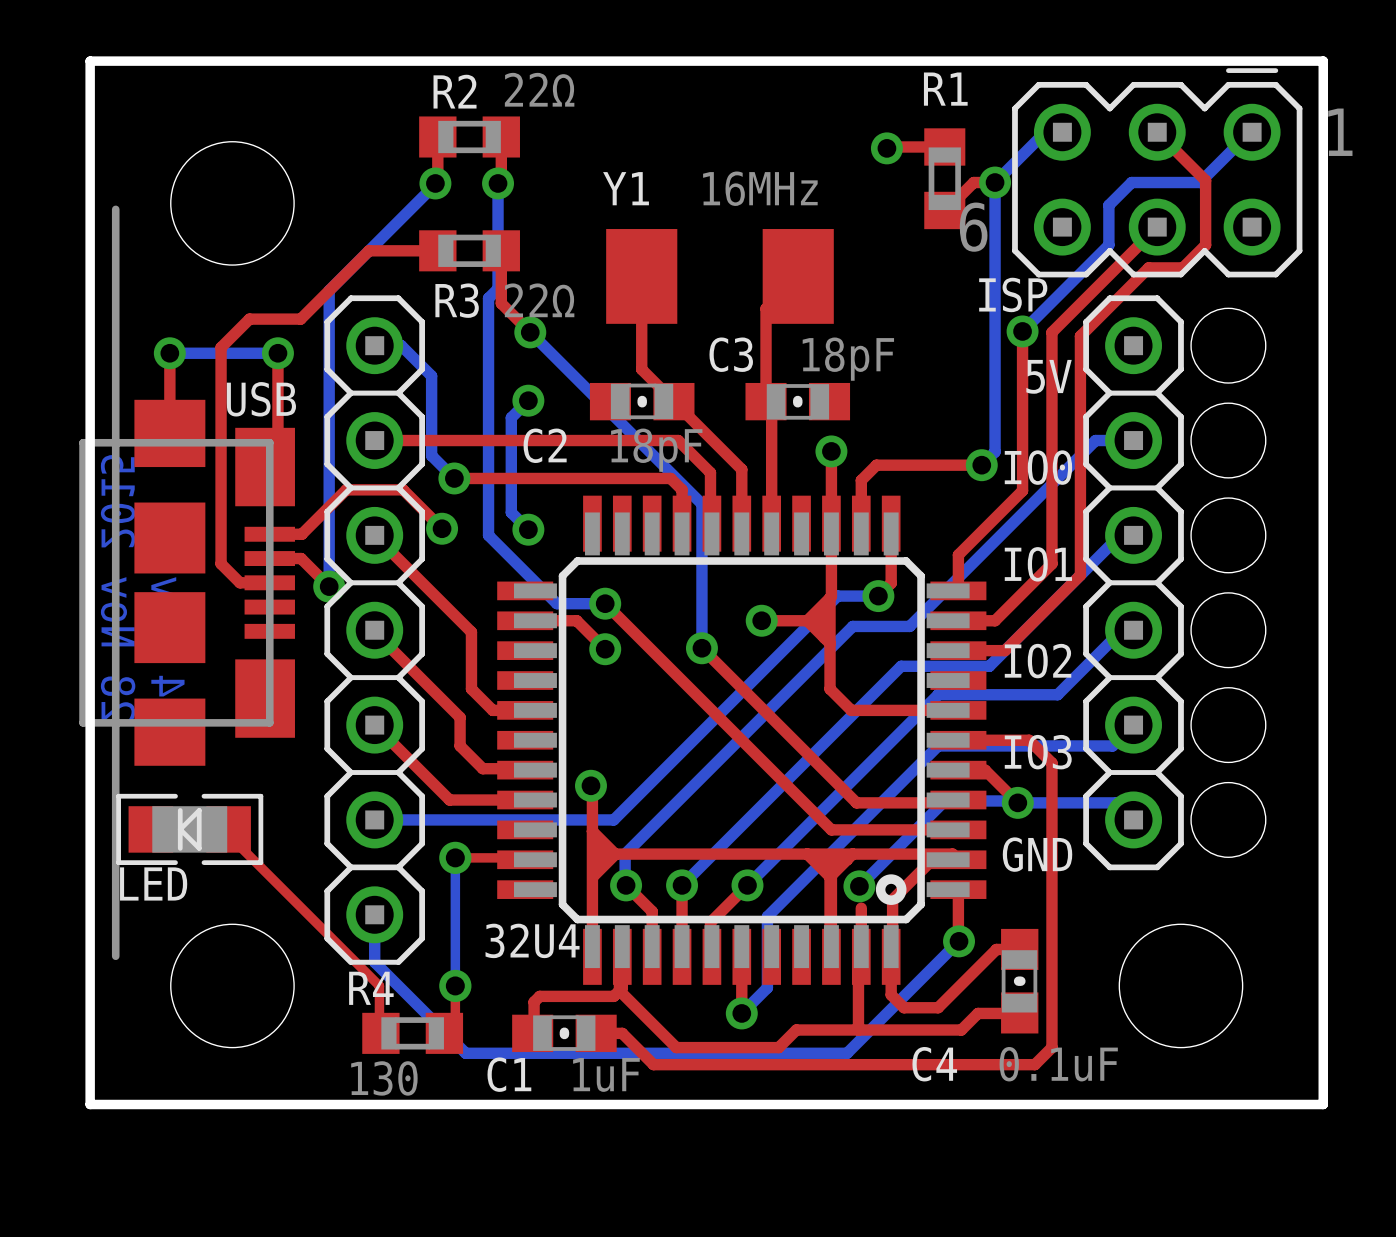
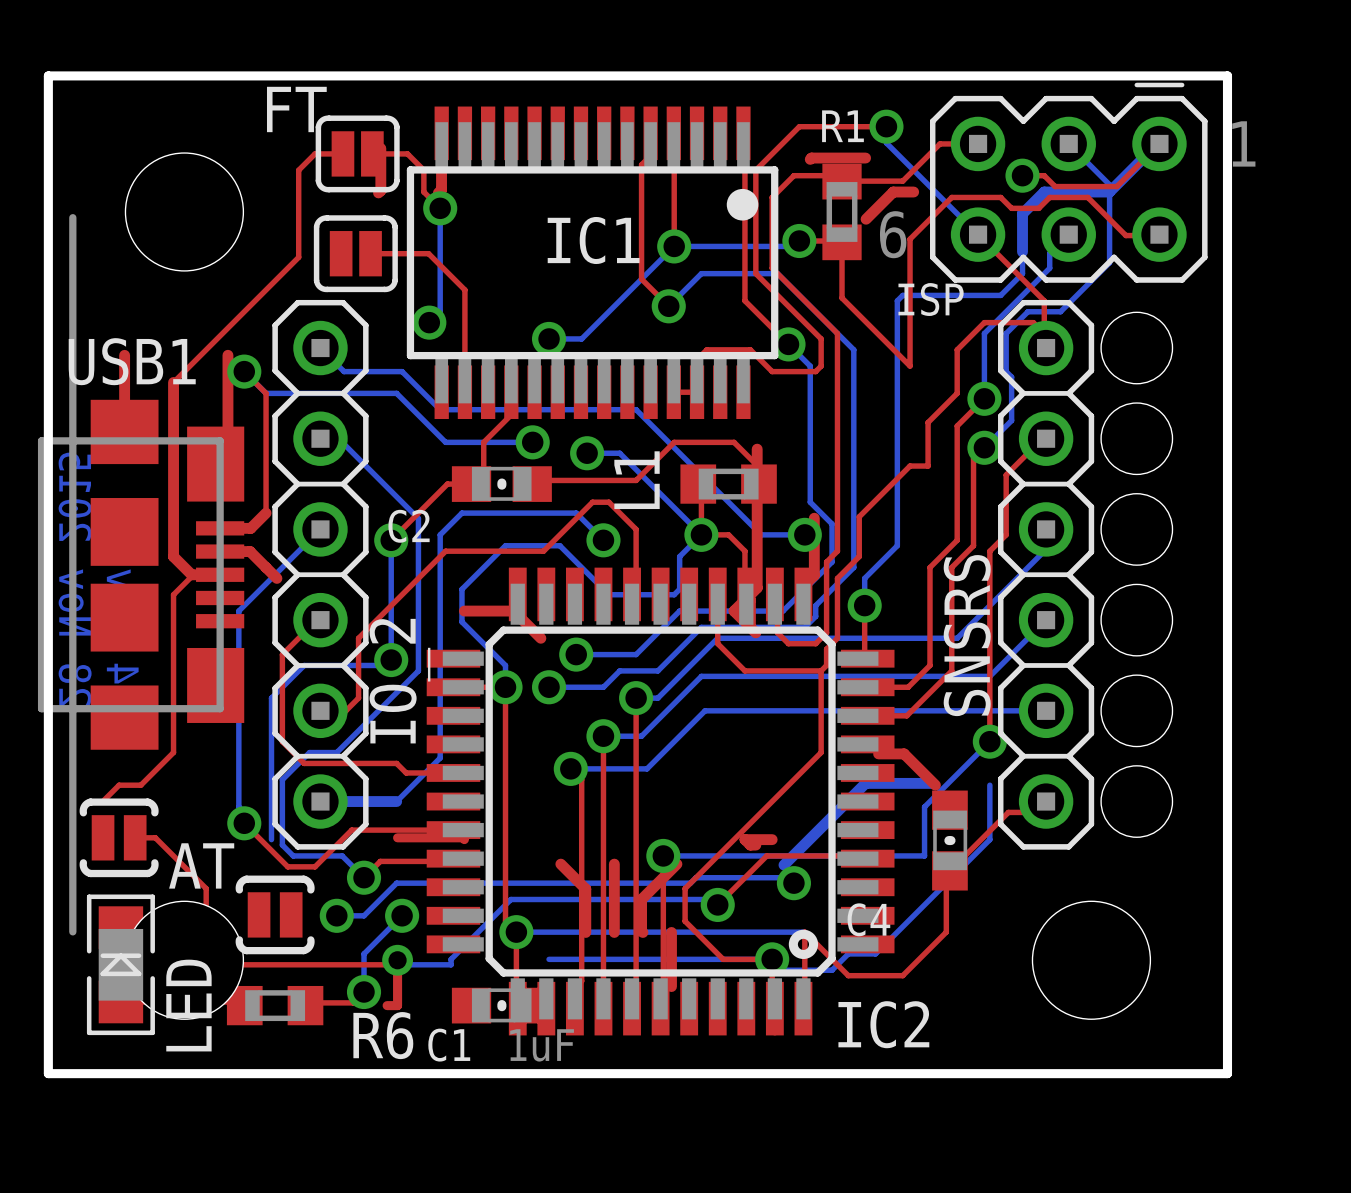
text: none -> FT (296, 109)
top track: none -> (886, 126) (799, 126) (755, 170) (755, 273) (821, 338) (821, 366) (815, 371) (772, 371) (750, 349) (706, 349) (697, 359) (697, 392) (673, 392)
bottom track: none -> (886, 126) (886, 143) (978, 234)
via: none -> (886, 126)
top track: none -> (743, 133) (744, 300) (788, 344)
top track: none -> (978, 143) (939, 143) (902, 181) (842, 181)
bottom track: (1062, 132) (1045, 132) (995, 182) (995, 451) (981, 465) -> none
top track: (1157, 132) (1205, 180) (1205, 245) (1182, 267) (1148, 267) (1080, 336) (1080, 575) (1005, 650) (958, 650) -> none
bottom track: none -> (1068, 143) (1109, 184) (1109, 262) (1060, 311) (1027, 311) (1006, 333) (1006, 371) (1011, 377) (1011, 420) (984, 447)
top track: none -> (1159, 143) (1116, 186) (1055, 186) (1044, 175) (1022, 175)
R2: 22Ω (469, 136) -> none
top track: none -> (652, 148) (650, 146) (650, 133) (652, 135) (652, 153) (641, 164) (641, 279) (668, 306)
part: none -> (357, 153)
top track: none -> (372, 153) (407, 153) (423, 170) (423, 192) (440, 208)
top track: none -> (674, 155) (674, 246)
via: (886, 148) -> none
via: none -> (1022, 175)
top track: none -> (854, 181) (842, 181) (836, 175) (793, 175) (772, 197) (772, 268) (837, 333) (837, 551) (826, 562) (826, 632) (815, 643) (788, 643) (777, 632) (777, 597) (774, 594)
R1 position: (944, 178) -> (842, 211)
via: (995, 182) -> none
bottom track: (435, 183) (329, 290) (329, 586) -> none
via: (435, 183) -> none
bottom track: (498, 183) (498, 288) (488, 298) (488, 535) (556, 603) (605, 603) -> none
via position: (498, 183) -> (440, 208)
text: Y1 (626, 188) -> none
bottom track: none -> (440, 208) (440, 311) (429, 322)
top track: none -> (978, 234) (1044, 300) (1044, 346) (1046, 348) (1046, 335) (1033, 322) (984, 322) (957, 349) (957, 393) (928, 422) (928, 466) (910, 466) (859, 516) (859, 556) (837, 578) (837, 638) (826, 649) (826, 665) (821, 670)
top track: (1157, 227) (1051, 332) (1051, 563) (995, 620) (958, 620) -> none
bottom track: none -> (1068, 234) (1049, 253) (1049, 268) (984, 333) (984, 398)
top track: none -> (1159, 234) (1125, 235) (1087, 197) (1049, 197) (1038, 208) (1011, 208) (1000, 197) (951, 197) (910, 239) (910, 366) (842, 298) (842, 242) (799, 241)
bottom track: none -> (799, 241) (793, 246) (674, 246) (581, 338) (549, 338)
via: none -> (799, 241)
via: none -> (674, 246)
bottom track: (1108, 245) (1022, 331) -> (1022, 251) (1022, 273) (1000, 295) (902, 295) (897, 300) (897, 545) (864, 578) (864, 605)
part: none -> (355, 253)
top track: none -> (370, 253) (428, 253) (464, 289) (464, 392)
top track: (437, 250) (369, 250) (300, 319) (249, 319) (221, 347) (221, 381) -> (342, 153) (315, 153) (298, 170) (298, 257) (173, 382)
R3: 22Ω (469, 250) -> none
top track: (501, 250) (501, 303) (530, 332) -> none
IC1: none -> (592, 262)
top track: (641, 276) (641, 369) (741, 469) (741, 523) -> none
part: 16MHz (719, 276) -> none
top track: (798, 276) (766, 308) (766, 401) (771, 407) (771, 523) -> none
bottom track: none -> (668, 306) (701, 273) (777, 273) (853, 349) (853, 567) (815, 605) (815, 616) (804, 627) (701, 627) (657, 670) (619, 670) (603, 687) (549, 687)
via: none -> (668, 306)
via: none -> (429, 322)
top track: (1022, 331) (1022, 490) (958, 554) (958, 590) -> none
via: (1022, 331) -> none
bottom track: (530, 332) (701, 504) (701, 648) -> none
via: (530, 332) -> none
via: none -> (549, 338)
bottom track: none -> (788, 344) (810, 366) (810, 502) (832, 523) (832, 562) (783, 611) (679, 611) (636, 654) (576, 654)
via: none -> (788, 344)
bottom track: (374, 345) (401, 345) (431, 376) (431, 455) (454, 478) -> (320, 348) (344, 371) (402, 371) (440, 409) (636, 409) (761, 534) (804, 534)
bottom track: (169, 353) (277, 353) -> none
via: (169, 353) -> none
via position: (277, 353) -> (244, 371)
bottom track: none -> (244, 371) (266, 393) (396, 393) (445, 442) (532, 442)
text: 5V (1049, 376) -> none
top track: none -> (510, 392) (510, 415) (483, 442) (483, 471) (471, 484) (447, 484) (391, 540)
top track: none -> (984, 398) (957, 426) (957, 540) (929, 567) (929, 665) (908, 687) (867, 687)
via: none -> (984, 398)
USB name: USB (261, 399) -> USB1 (132, 361)
bottom track: (528, 400) (511, 417) (511, 512) (528, 529) -> none
via: (528, 400) -> none
C2 position: (642, 401) -> (501, 484)
C3: 18pF (797, 401) -> none
top track: (374, 440) (678, 440) (710, 472) (711, 523) -> none
bottom track: none -> (320, 438) (338, 438) (418, 518) (418, 670) (336, 752) (309, 752) (282, 779) (282, 845) (293, 855) (342, 855) (364, 877)
top track: none -> (1046, 438) (1042, 438) (1006, 475) (1006, 534) (989, 551) (989, 741)
bottom track: (1133, 440) (1095, 440) (909, 626) (852, 626) (625, 854) (626, 885) -> none
via: none -> (532, 442)
C2 value: 18pF (656, 450) -> none
top track: none -> (984, 447) (973, 458) (973, 545) (951, 567) (951, 670) (906, 715) (867, 715)
via: none -> (984, 447)
via: (831, 451) -> none
bottom track: none -> (587, 453) (619, 453) (701, 534) (679, 556) (679, 589) (674, 594) (608, 594) (559, 545) (505, 545) (461, 589) (461, 621) (505, 665) (505, 687)
via: none -> (587, 453)
top track: (981, 465) (876, 465) (861, 480) (861, 523) -> none
via: (981, 465) -> none
text: IO0 (1038, 467) -> none
top track: (454, 478) (670, 478) (682, 489) (682, 523) -> none
via: (454, 478) -> none
top track: none -> (532, 484) (535, 480) (636, 480) (674, 442) (734, 442) (758, 467) (758, 484)
top track: none -> (698, 484) (701, 487) (701, 534) (728, 534) (744, 551) (746, 594)
L1: none -> (728, 484)
top track: (317, 518) (346, 489) (403, 489) (442, 528) -> (266, 513) (266, 393) (244, 371)
via position: (442, 528) -> (391, 540)
via: (528, 529) -> none
top track: (374, 535) (471, 632) (471, 689) (492, 710) (525, 710) -> none
bottom track: none -> (320, 529) (238, 611) (238, 806) (244, 812) (244, 823)
bottom track: (1133, 535) (1120, 535) (989, 666) (901, 666) (682, 885) -> (1046, 529) (1046, 549) (957, 638) (717, 638) (657, 698) (636, 698)
via: none -> (701, 534)
via: none -> (804, 534)
bottom track: none -> (391, 540) (391, 660) (385, 665) (304, 665) (271, 698) (271, 839)
via: none -> (603, 540)
text: IO1 (1038, 564) -> none
IO_2: none -> (320, 574)
top track: none -> (189, 578) (173, 594) (173, 752) (140, 785) (119, 785) (102, 801)
via: (329, 586) -> none
bottom track: (878, 596) (837, 596) (613, 819) (454, 819) -> (603, 540) (576, 513) (461, 513) (440, 534) (440, 758) (396, 801)
via: (878, 596) -> none
top track: (830, 597) (830, 689) (851, 710) (958, 710) -> none
top track: (605, 603) (831, 829) (958, 829) -> none
via: (605, 603) -> none
top track: none -> (717, 594) (717, 643) (744, 670) (821, 670)
top track: none -> (864, 605) (864, 655) (867, 658)
via: none -> (864, 605)
top track: (761, 620) (807, 620) -> none
via: (761, 620) -> none
top track: (374, 630) (460, 717) (460, 745) (482, 768) (525, 770) -> (320, 620) (316, 620) (282, 654) (282, 741) (304, 763) (396, 763) (406, 772) (453, 772)
part: (374, 630) -> none
bottom track: (1133, 630) (1122, 630) (1057, 694) (938, 694) (747, 885) -> (1046, 620) (989, 676) (701, 676) (641, 736) (603, 736)
text: none -> SNSRS (967, 635)
top track: (701, 648) (856, 802) (955, 802) (958, 800) -> none
via: (701, 648) -> none
via: (605, 649) -> none
text: IO2 (1038, 661) -> none
via: none -> (576, 654)
via: none -> (391, 660)
top track: none -> (821, 670) (821, 752) (685, 888) (685, 921) (723, 959) (772, 959) (772, 1005) (774, 1008) (774, 1032)
top track: none -> (453, 687) (505, 687) (505, 921) (516, 932) (517, 1008)
via: none -> (505, 687)
via: none -> (549, 687)
top track: none -> (636, 698) (636, 1004) (632, 1008)
via: none -> (636, 698)
top track: (374, 725) (449, 800) (525, 800) -> (320, 710) (345, 710) (358, 698) (358, 638) (445, 551) (543, 551) (592, 502) (608, 502) (636, 529) (636, 590) (632, 594)
bottom track: (1133, 725) (1112, 745) (938, 745) (767, 916) (767, 987) (741, 1013) -> (1046, 710) (705, 710) (647, 768) (570, 768)
part: (741, 740) -> none
top track: (958, 740) (1029, 740) (1051, 763) (1051, 1047) (1034, 1064) (653, 1064) (622, 1033) (596, 1033) -> none
top track: none -> (603, 736) (603, 1008)
via: none -> (603, 736)
text: IO3 (1038, 752) -> none
bottom track: none -> (989, 741) (924, 806) (924, 855) (663, 855)
via: none -> (989, 741)
top track: (590, 785) (592, 956) -> none
via: (590, 785) -> none
top track: none -> (570, 768) (581, 779) (581, 981) (570, 992) (570, 1004) (574, 1008)
via: none -> (570, 768)
bottom track: (1006, 802) (1116, 802) (1133, 819) -> none
via: (1017, 802) -> none
bottom track: none -> (989, 785) (989, 839) (875, 953) (848, 953) (832, 970) (783, 970) (772, 959) (549, 959)
IC2: none -> (660, 801)
top track: none -> (1046, 801) (1035, 812) (1008, 812) (946, 874) (946, 932) (902, 975) (848, 975) (804, 932) (803, 1008)
LED: (189, 829) -> none
top track: (228, 829) (228, 835) (379, 985) (380, 1033) -> none
top track: (592, 831) (615, 854) (952, 854) (958, 859) (932, 859) (892, 899) (891, 994) (904, 1007) (938, 1007) (996, 949) (1019, 949) (1012, 956) -> none
top track: none -> (244, 823) (287, 866) (315, 866) (351, 830) (453, 830)
via: none -> (244, 823)
top track: (602, 848) (602, 857) (592, 867) (592, 876) (615, 854) -> none
top track: (807, 854) (830, 876) (831, 956) (831, 875) (852, 854) -> none
text: GND (1037, 854) -> none
part: none -> (119, 837)
top track: none -> (135, 837) (155, 837) (206, 888) (206, 948) (222, 964) (402, 964)
bottom track: (455, 857) (455, 985) -> none
via: (455, 857) -> none
top track: none -> (663, 855) (663, 1005) (660, 1008)
top track: none -> (453, 858) (450, 861) (380, 861) (364, 877)
top track: none -> (867, 858) (865, 855) (766, 855) (717, 904)
via: (626, 885) -> none
via: (682, 885) -> none
via position: (747, 885) -> (663, 855)
via position: (859, 886) -> (793, 883)
text: none -> AT (201, 865)
top track: (960, 892) (958, 889) (959, 941) -> none
via: none -> (364, 877)
bottom track: none -> (793, 883) (788, 877) (695, 877) (690, 883) (396, 883) (364, 915) (336, 915)
top track: (861, 908) (861, 956) (858, 959) (858, 1030) -> none
bottom track: (374, 914) (374, 962) (465, 1053) (847, 1053) (959, 941) -> none
bottom track: none -> (717, 904) (712, 899) (510, 899) (451, 959) (451, 964) (402, 964)
via: none -> (717, 904)
part: none -> (275, 914)
via: none -> (336, 915)
bottom track: none -> (402, 915) (364, 953) (364, 992)
via: none -> (402, 915)
text: 32U4 (532, 940) -> none
via: (959, 941) -> none
bottom track: none -> (516, 932) (804, 932)
via: none -> (516, 932)
C4 position: (1019, 981) -> (949, 840)
via: none -> (772, 959)
part: none -> (120, 964)
via: (741, 1013) -> none
top track: (1019, 1013) (977, 1013) (961, 1030) (796, 1030) (778, 1047) (676, 1047) (619, 990) (619, 959) (622, 956) (622, 987) (613, 996) (539, 996) (534, 1002) (534, 1031) (532, 1033) (529, 1030) -> none
top track: none -> (364, 992) (353, 1002) (320, 1002) (317, 1005) (305, 1005)
via: none -> (364, 992)
text: none -> LED (188, 1005)
R6: none -> (275, 1005)
R4: 130 (412, 1033) -> none
text: 0.1uF (1058, 1064) -> none

